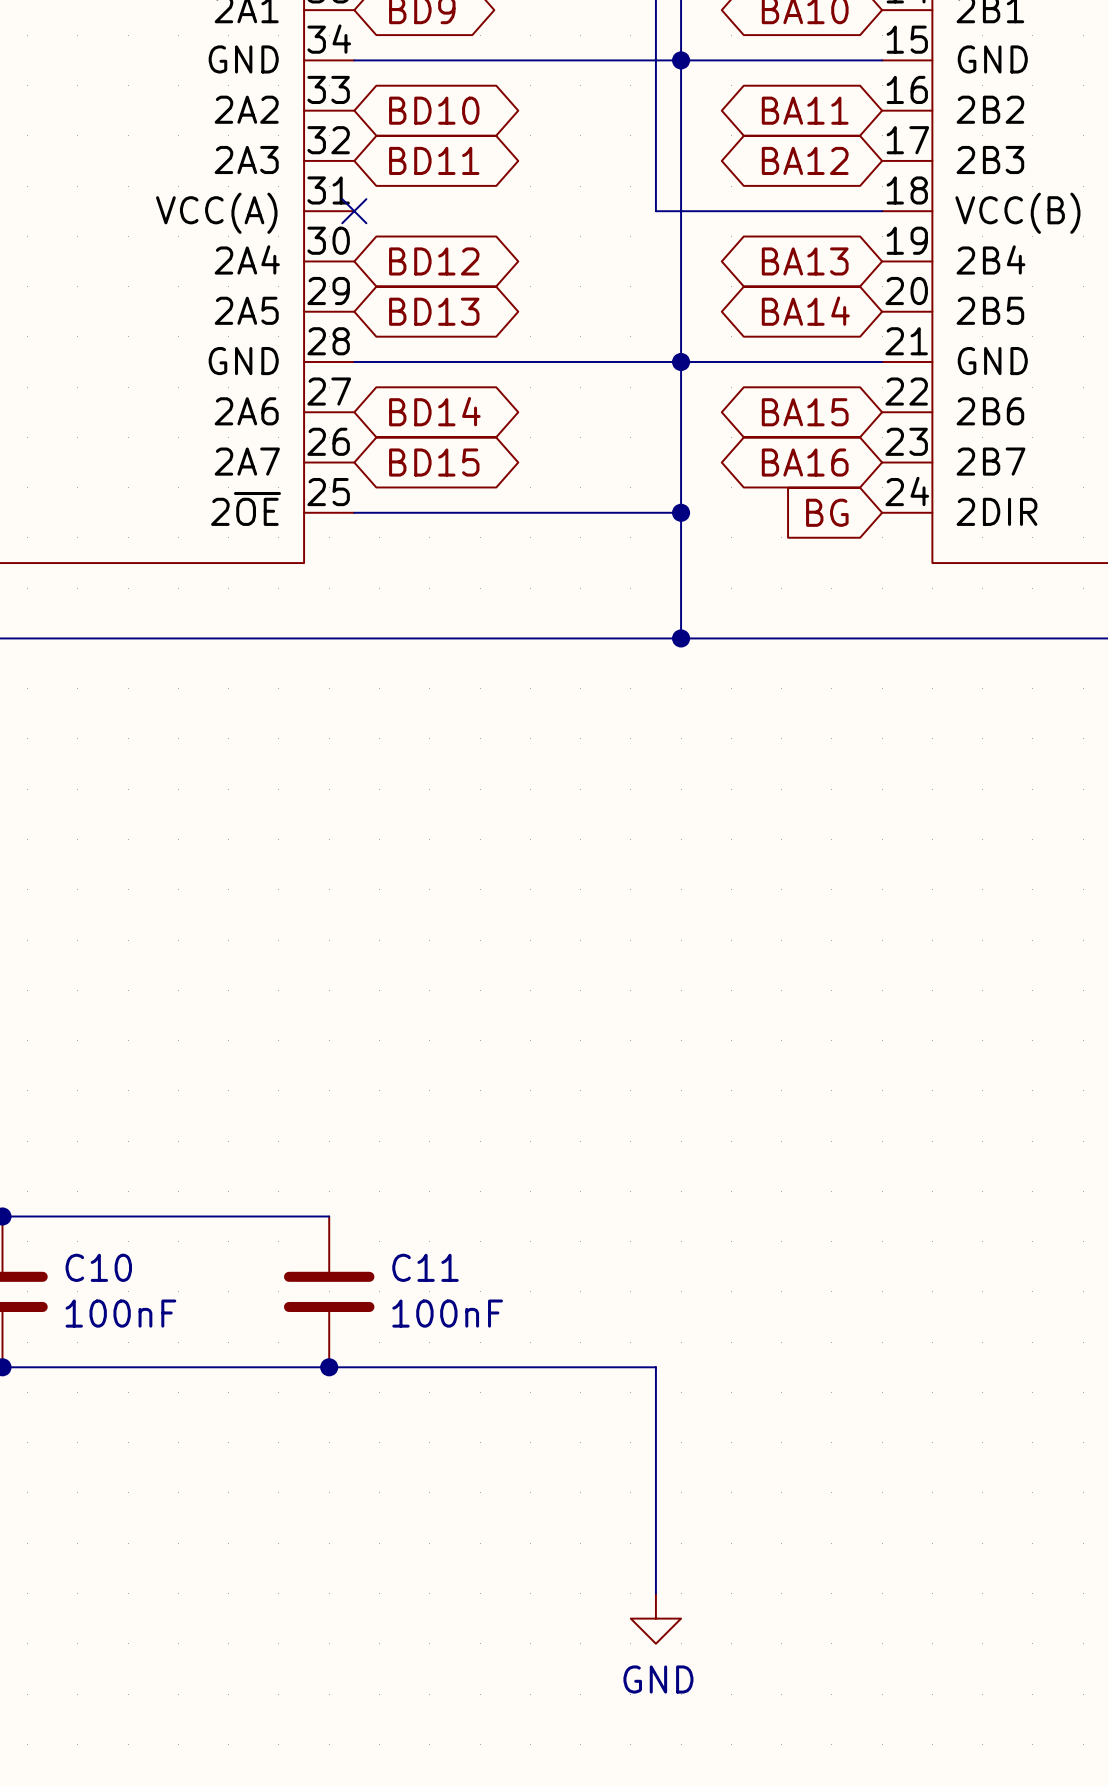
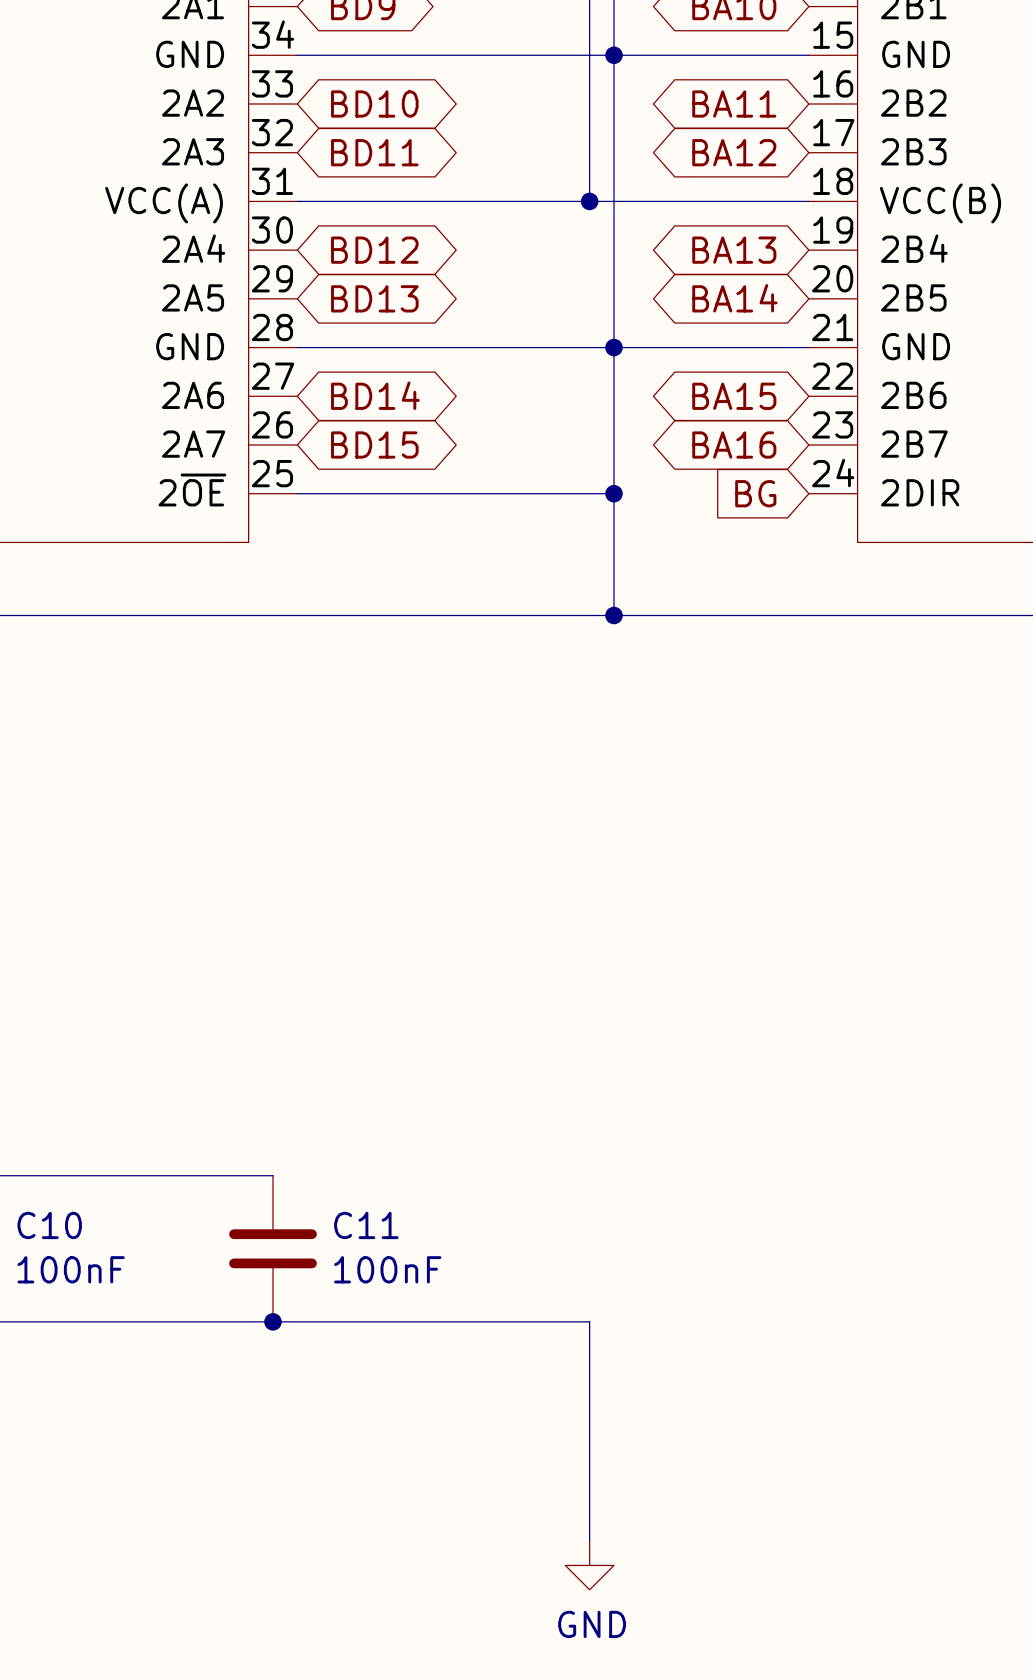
wire: none -> (297, 201) (589, 201)
no-connect mark: (354, 211) -> none
junction: none -> (589, 201)

